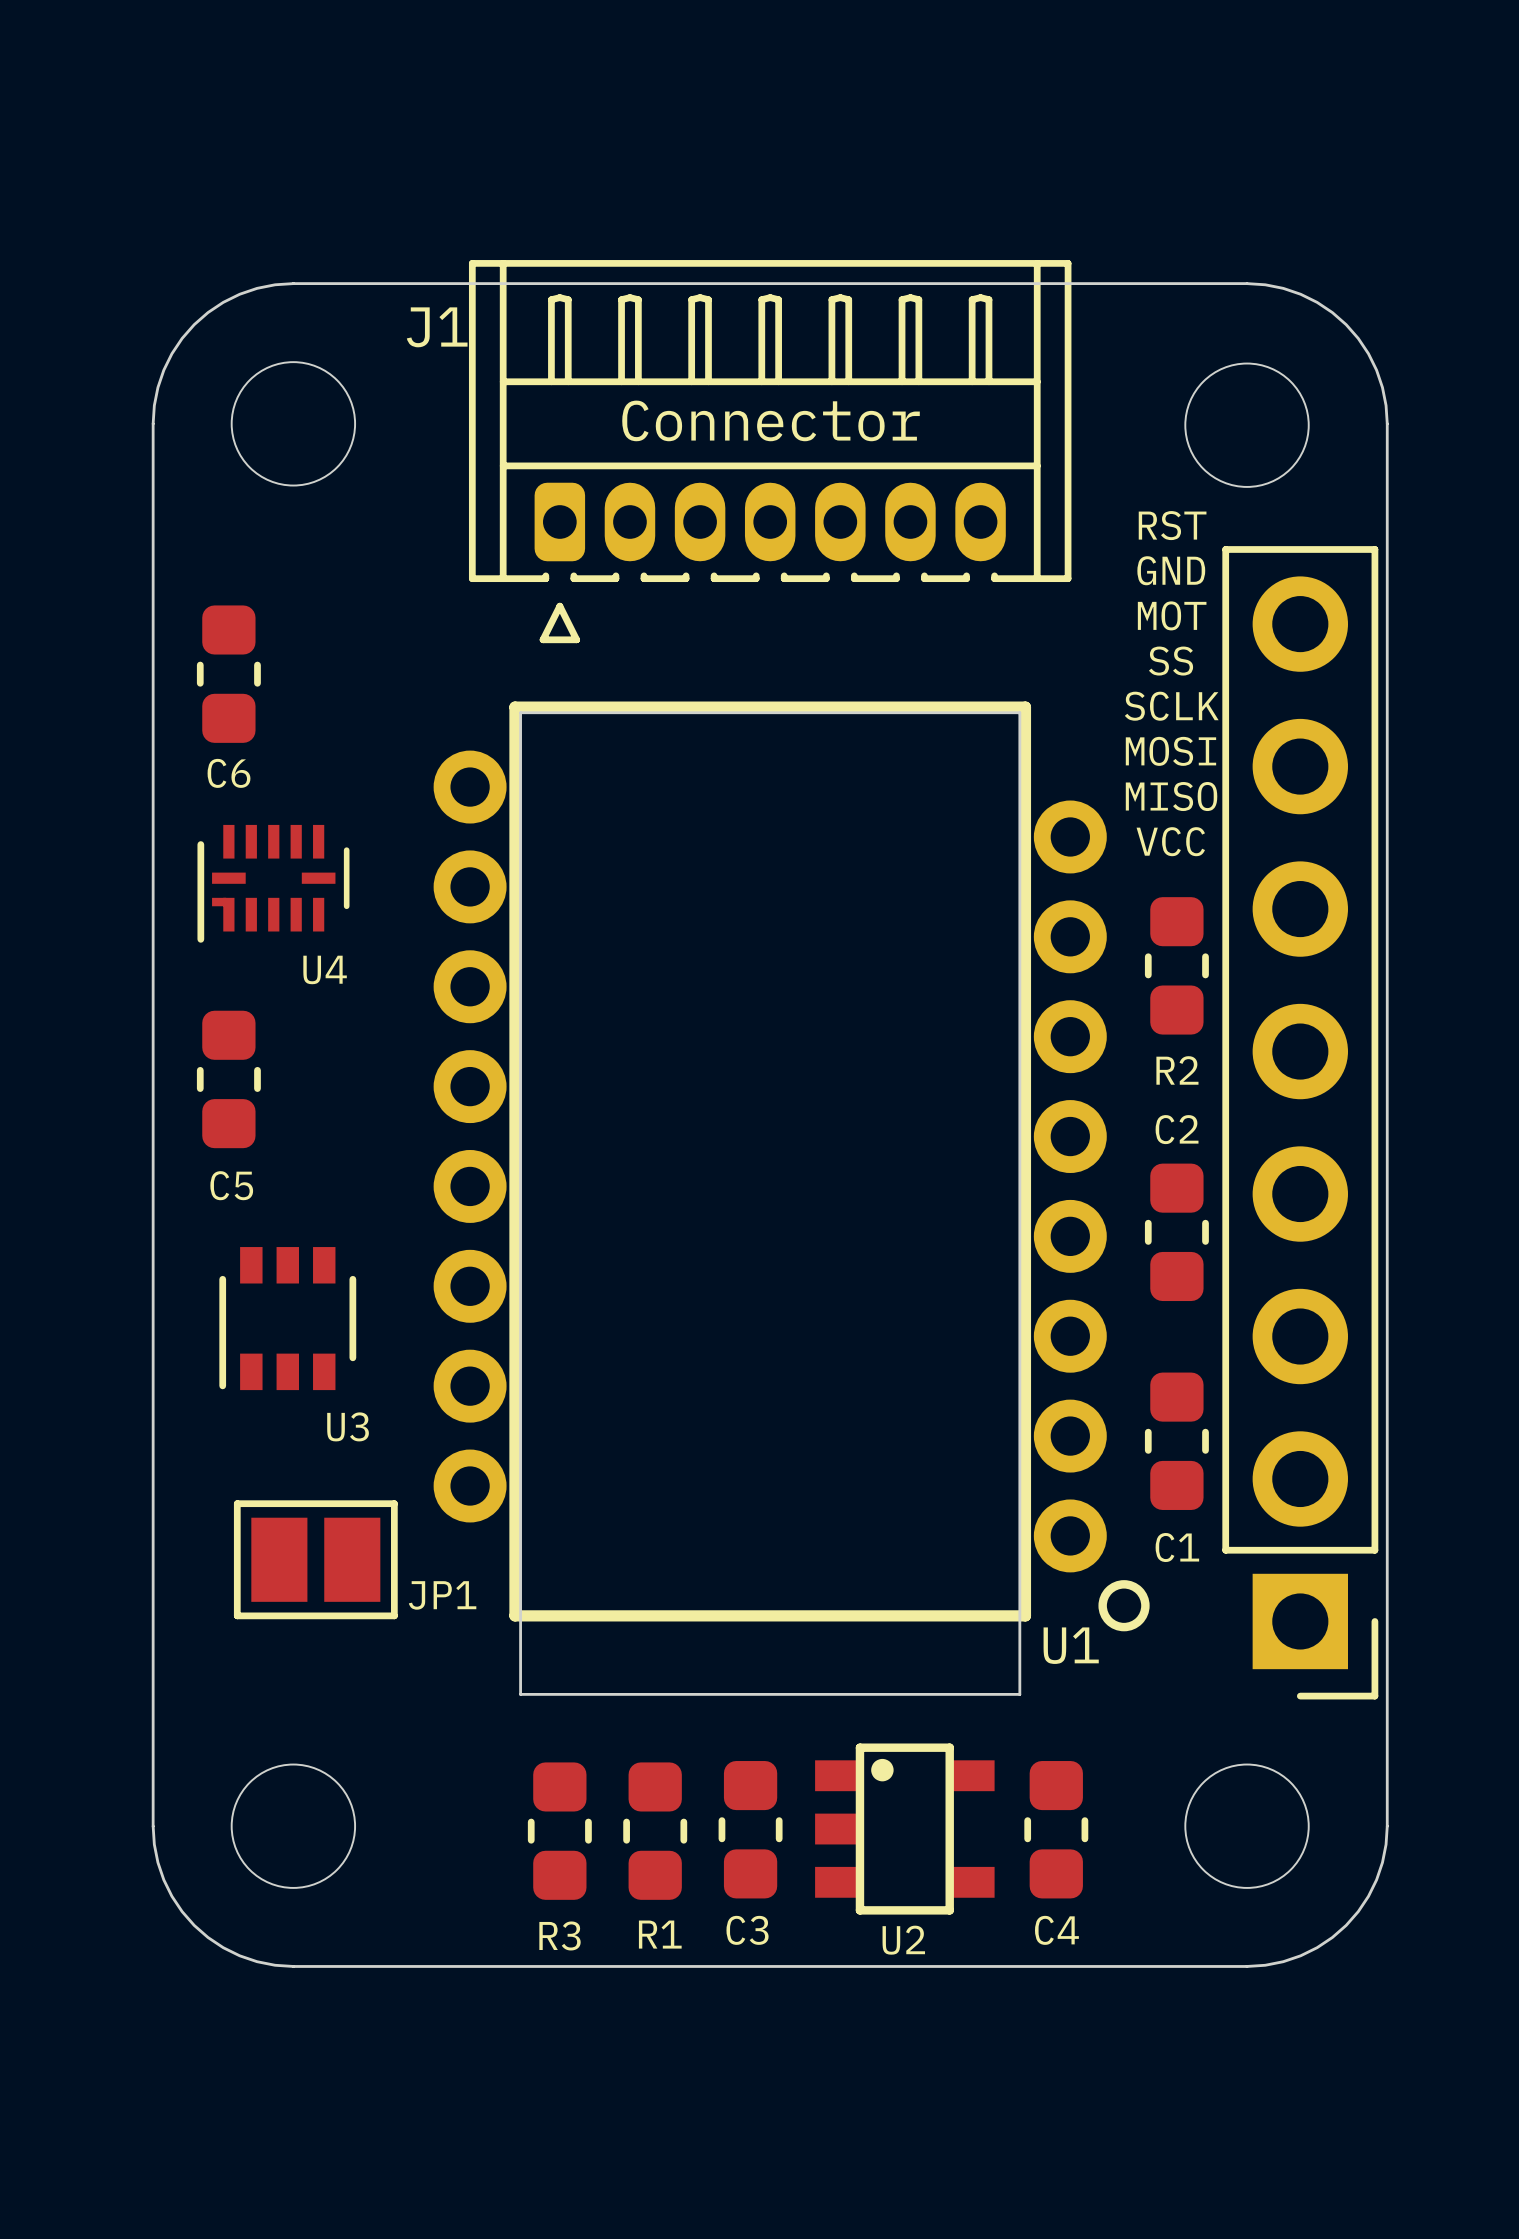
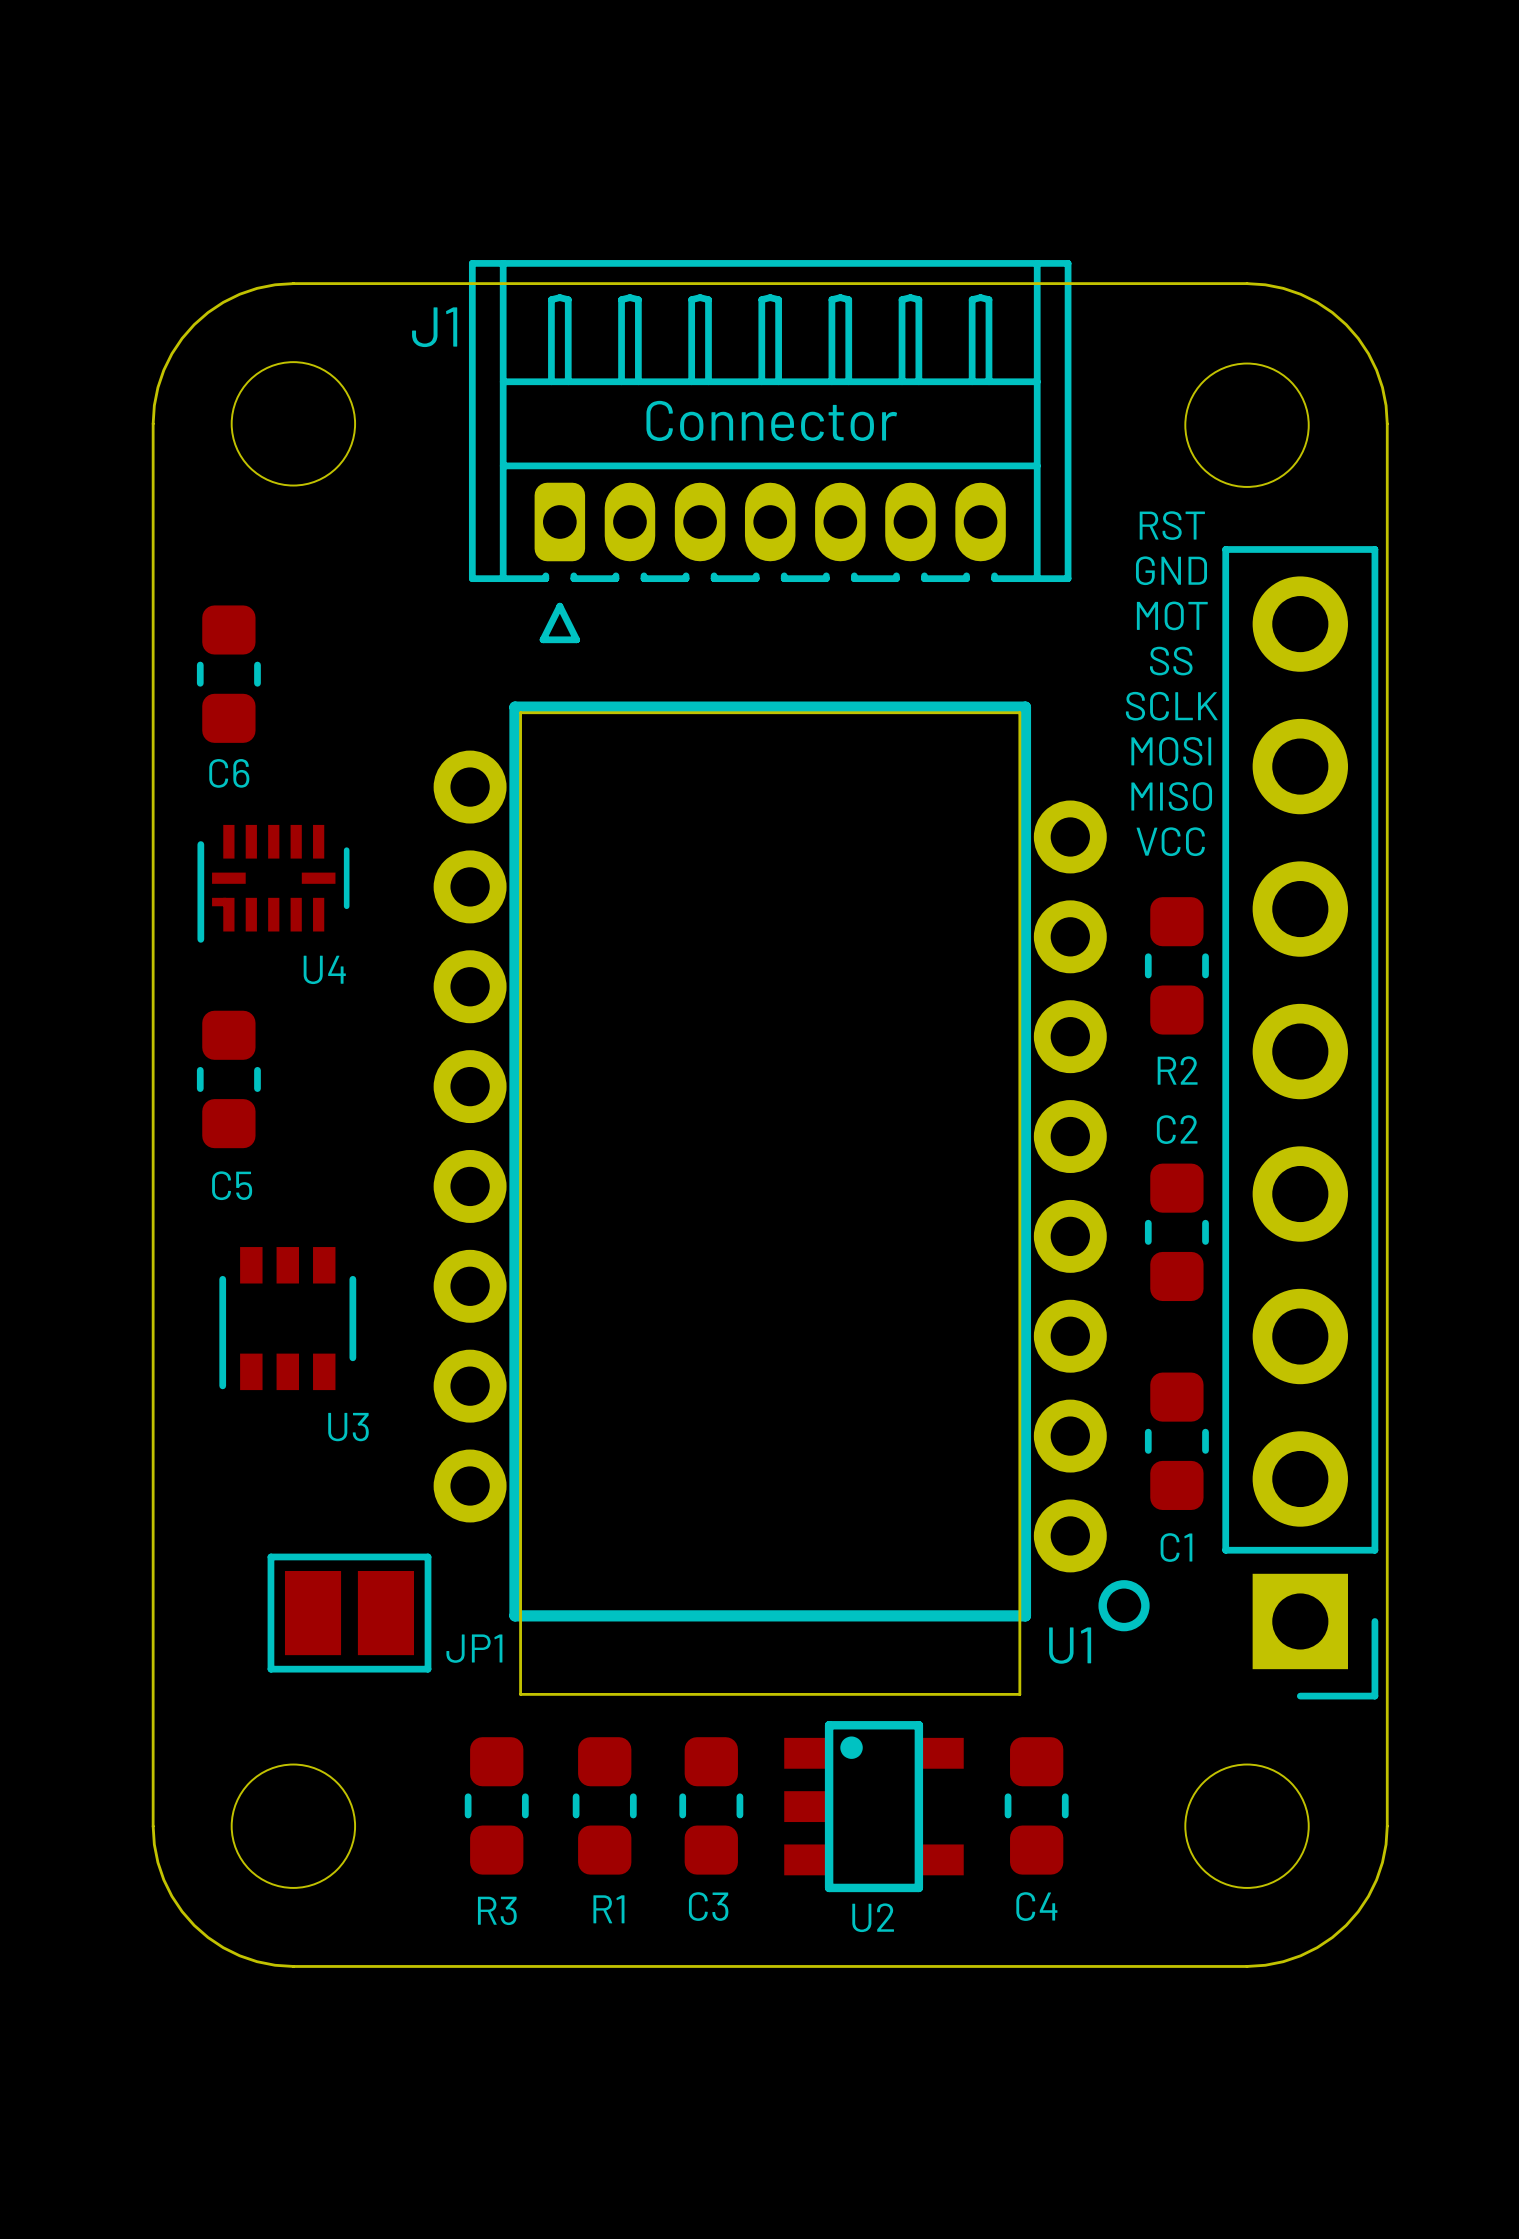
JP1 position: (315, 1559) -> (349, 1613)
C3 position: (750, 1829) -> (711, 1805)
U2 position: (904, 1829) -> (873, 1806)
C4 position: (1056, 1829) -> (1036, 1805)
R3 position: (559, 1831) -> (496, 1805)
R1 position: (655, 1831) -> (604, 1805)

